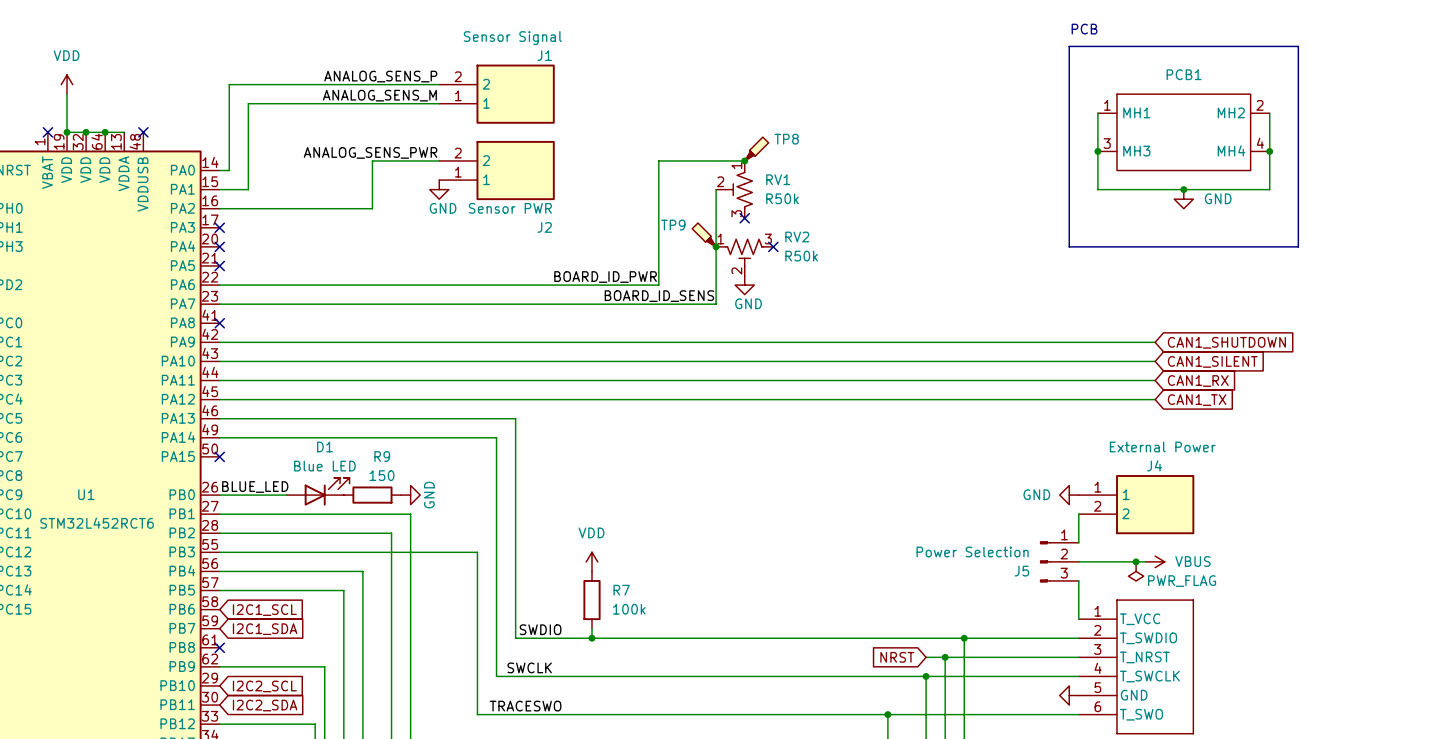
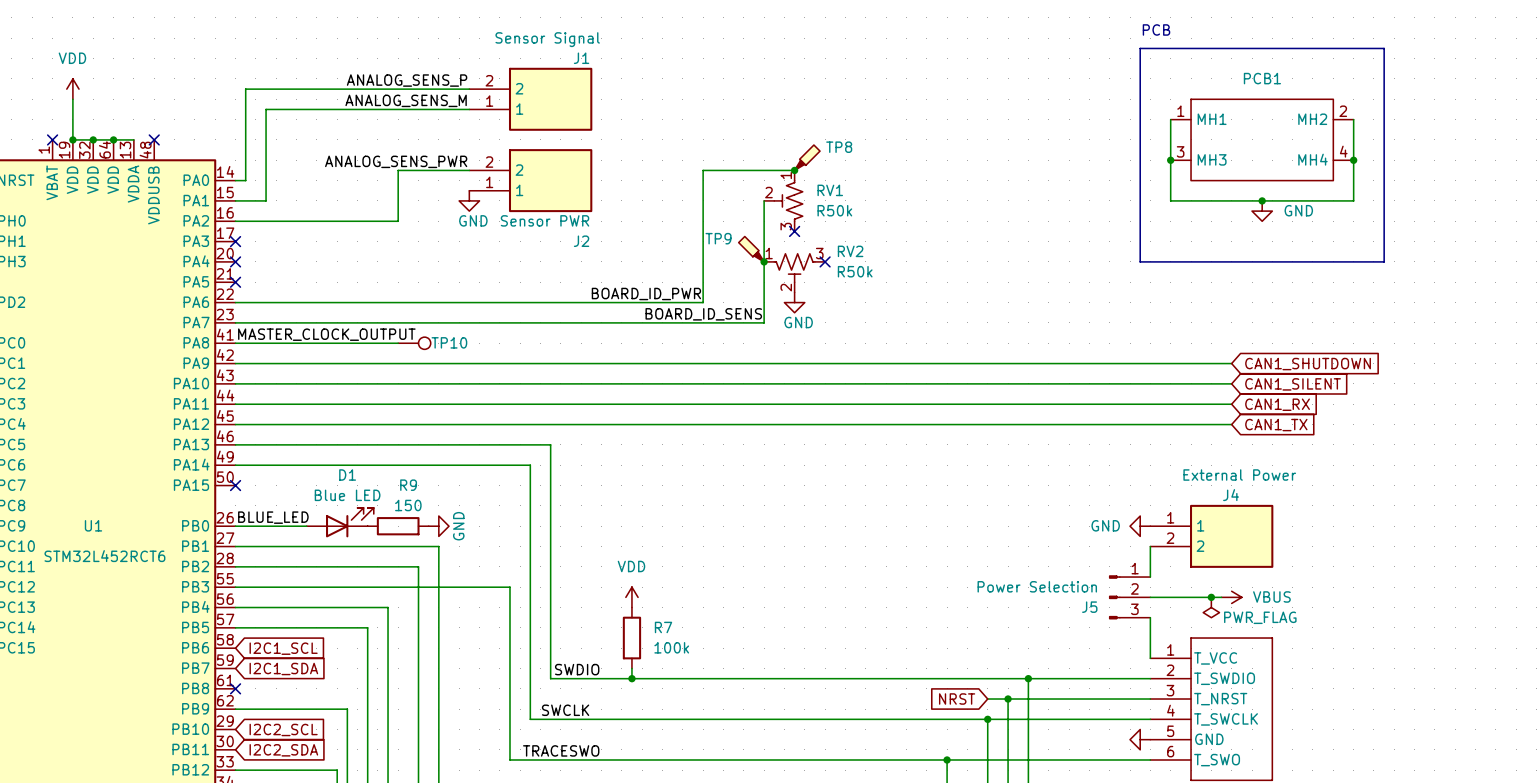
label: none -> MASTER_CLOCK_OUTPUT (326, 334)
wire: none -> (235, 343) (398, 343)
no-connect mark: (219, 323) -> none
TP10: none -> (414, 343)

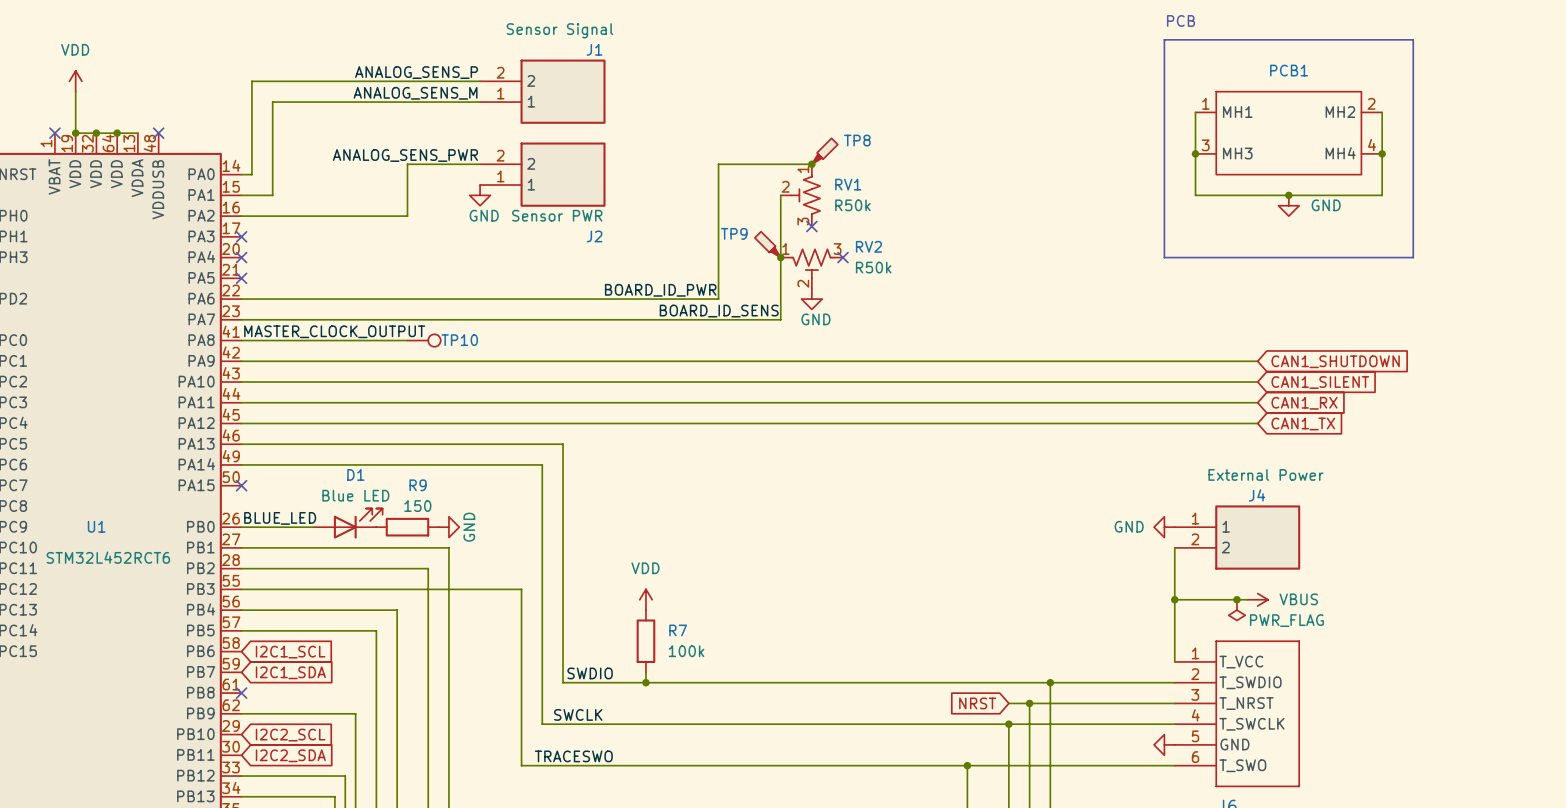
wire: none -> (1174, 579) (1174, 620)
J5: Power Selection (1129, 597) -> none
junction: none -> (1174, 599)

